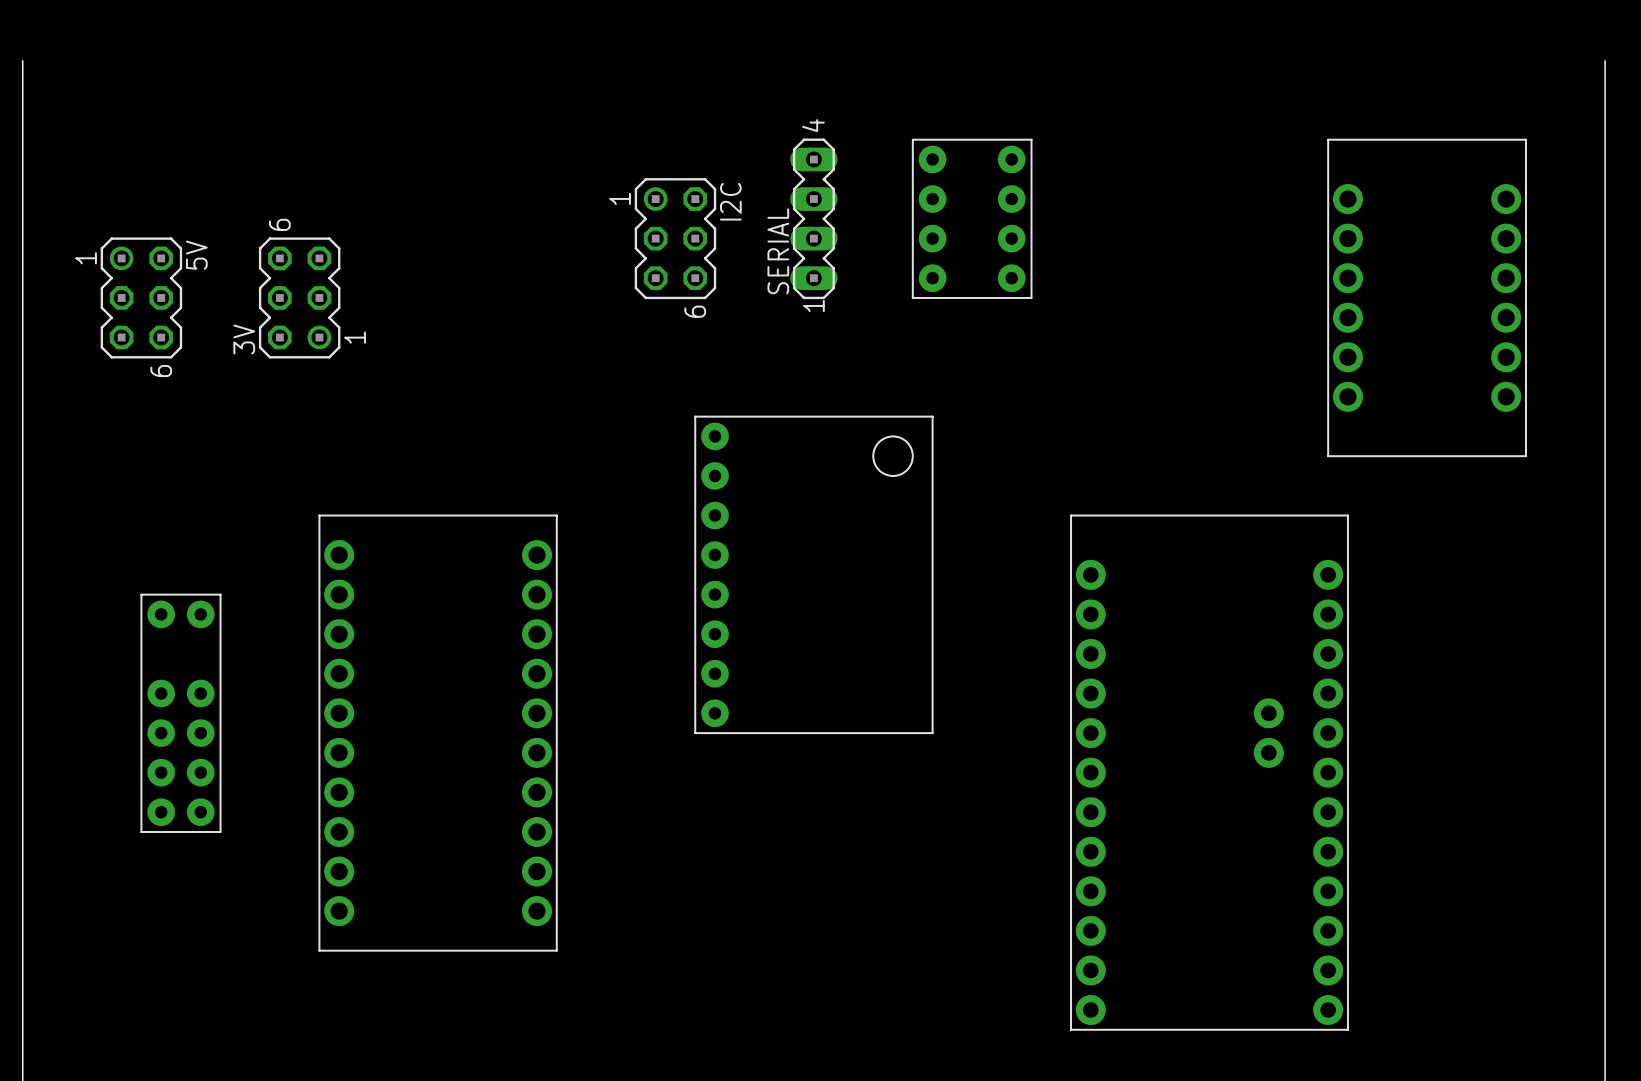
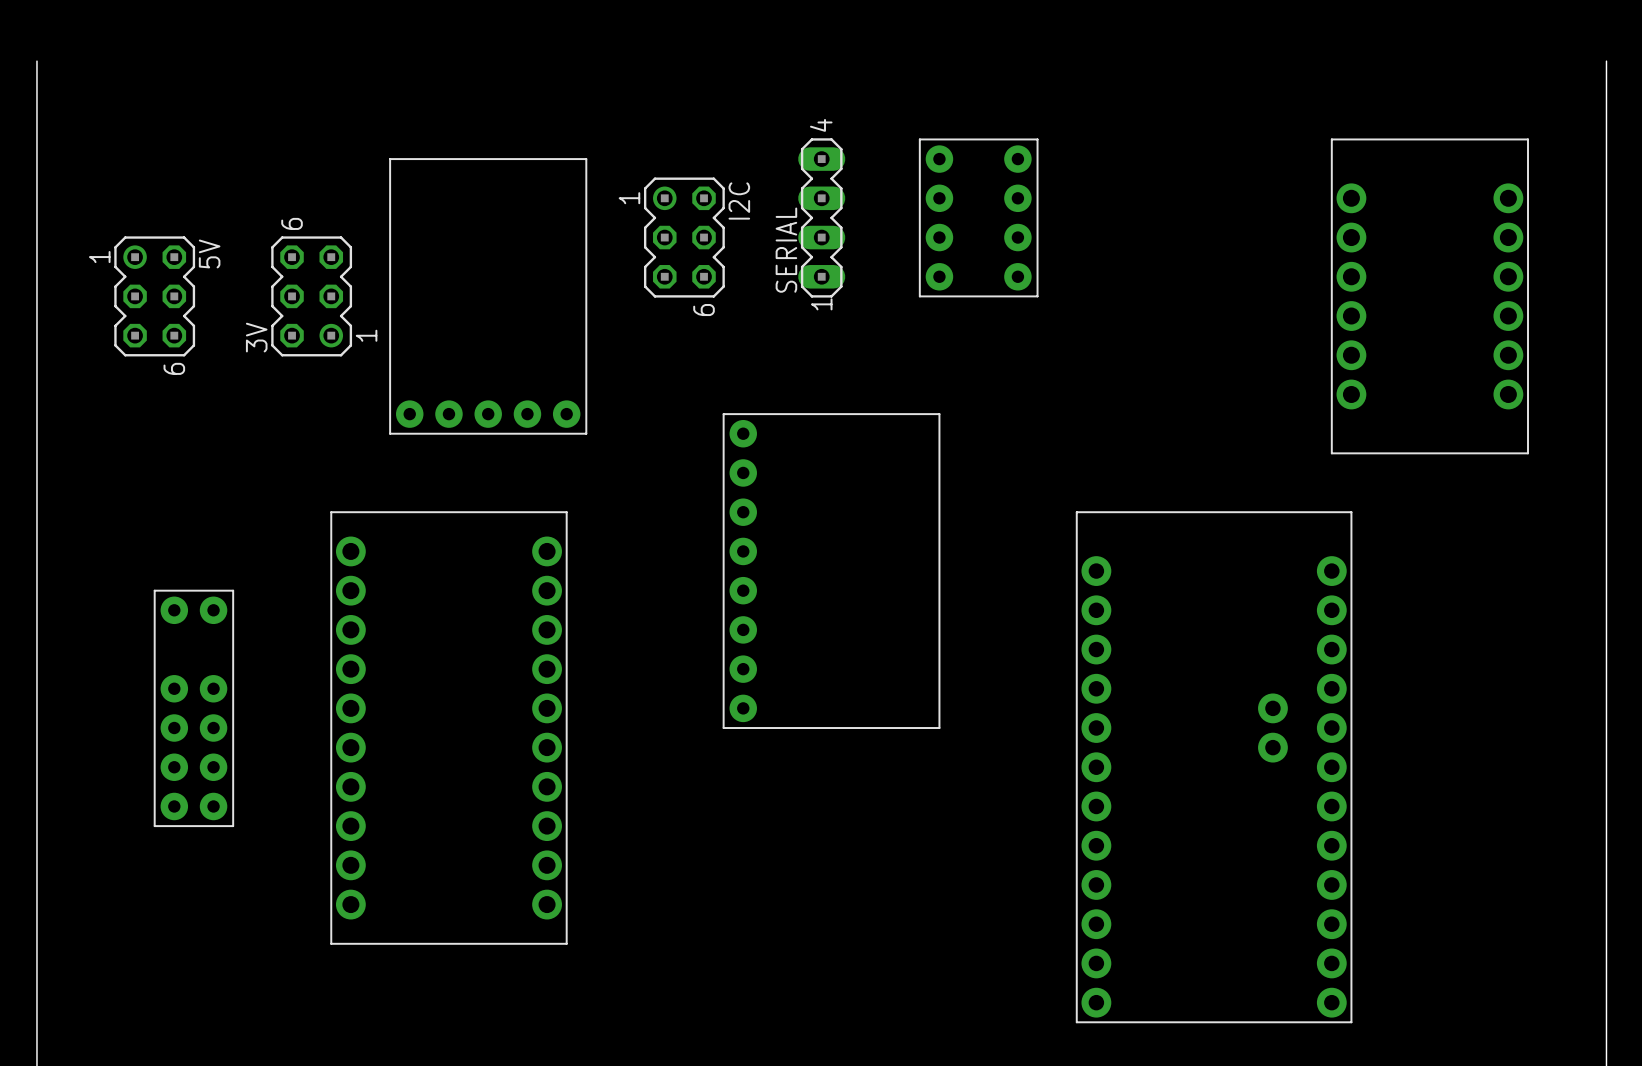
part: none -> (488, 296)
part footprint: [694, 415, 934, 735] -> [722, 413, 941, 729]

